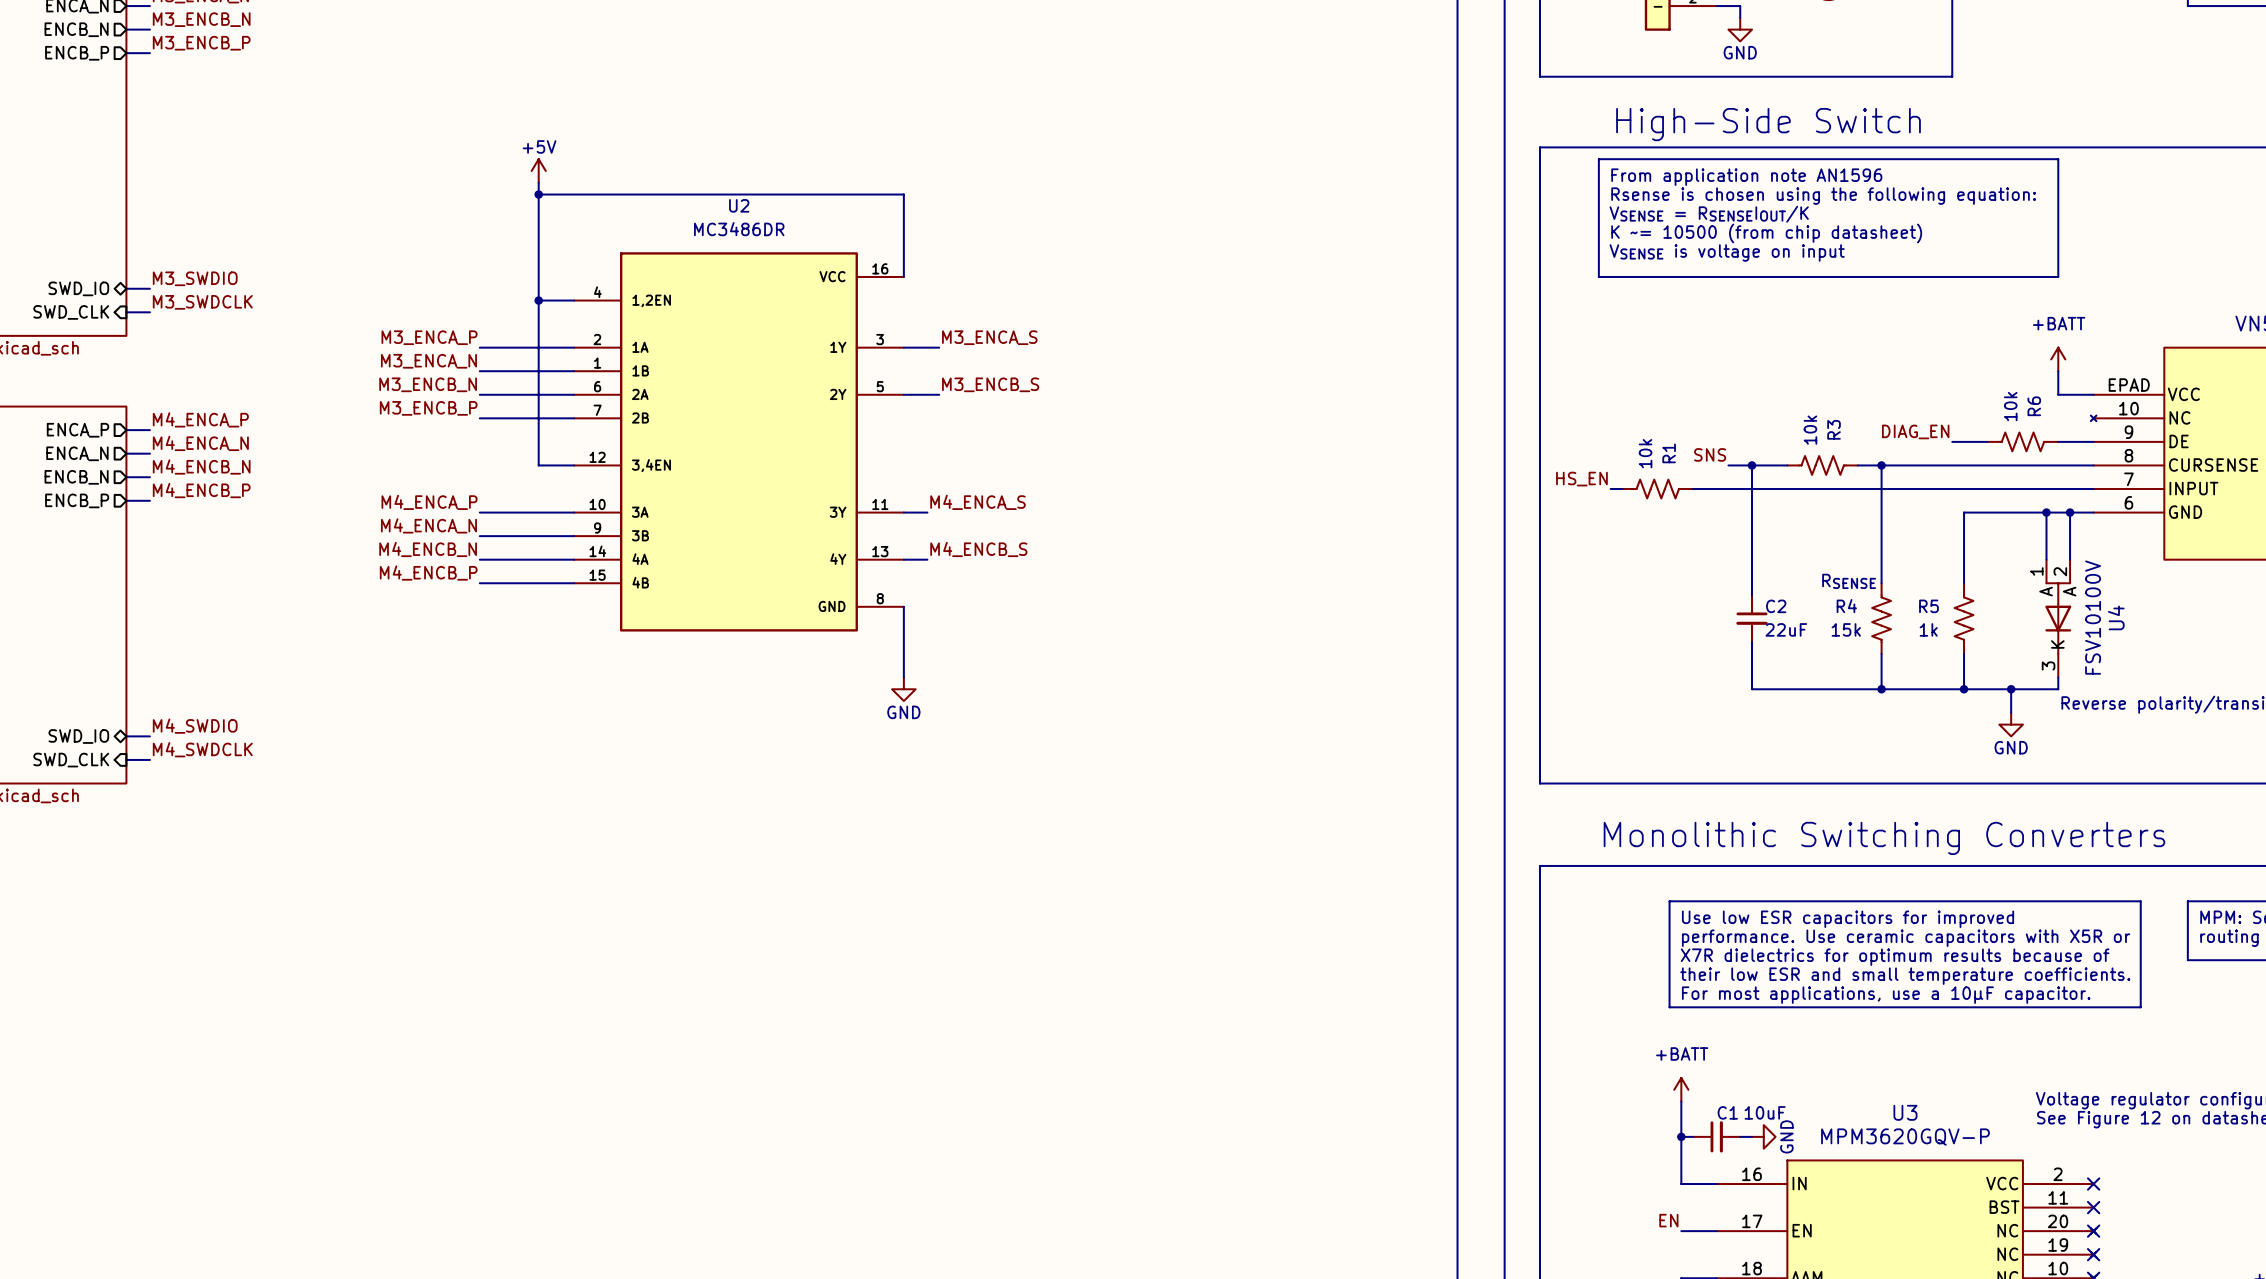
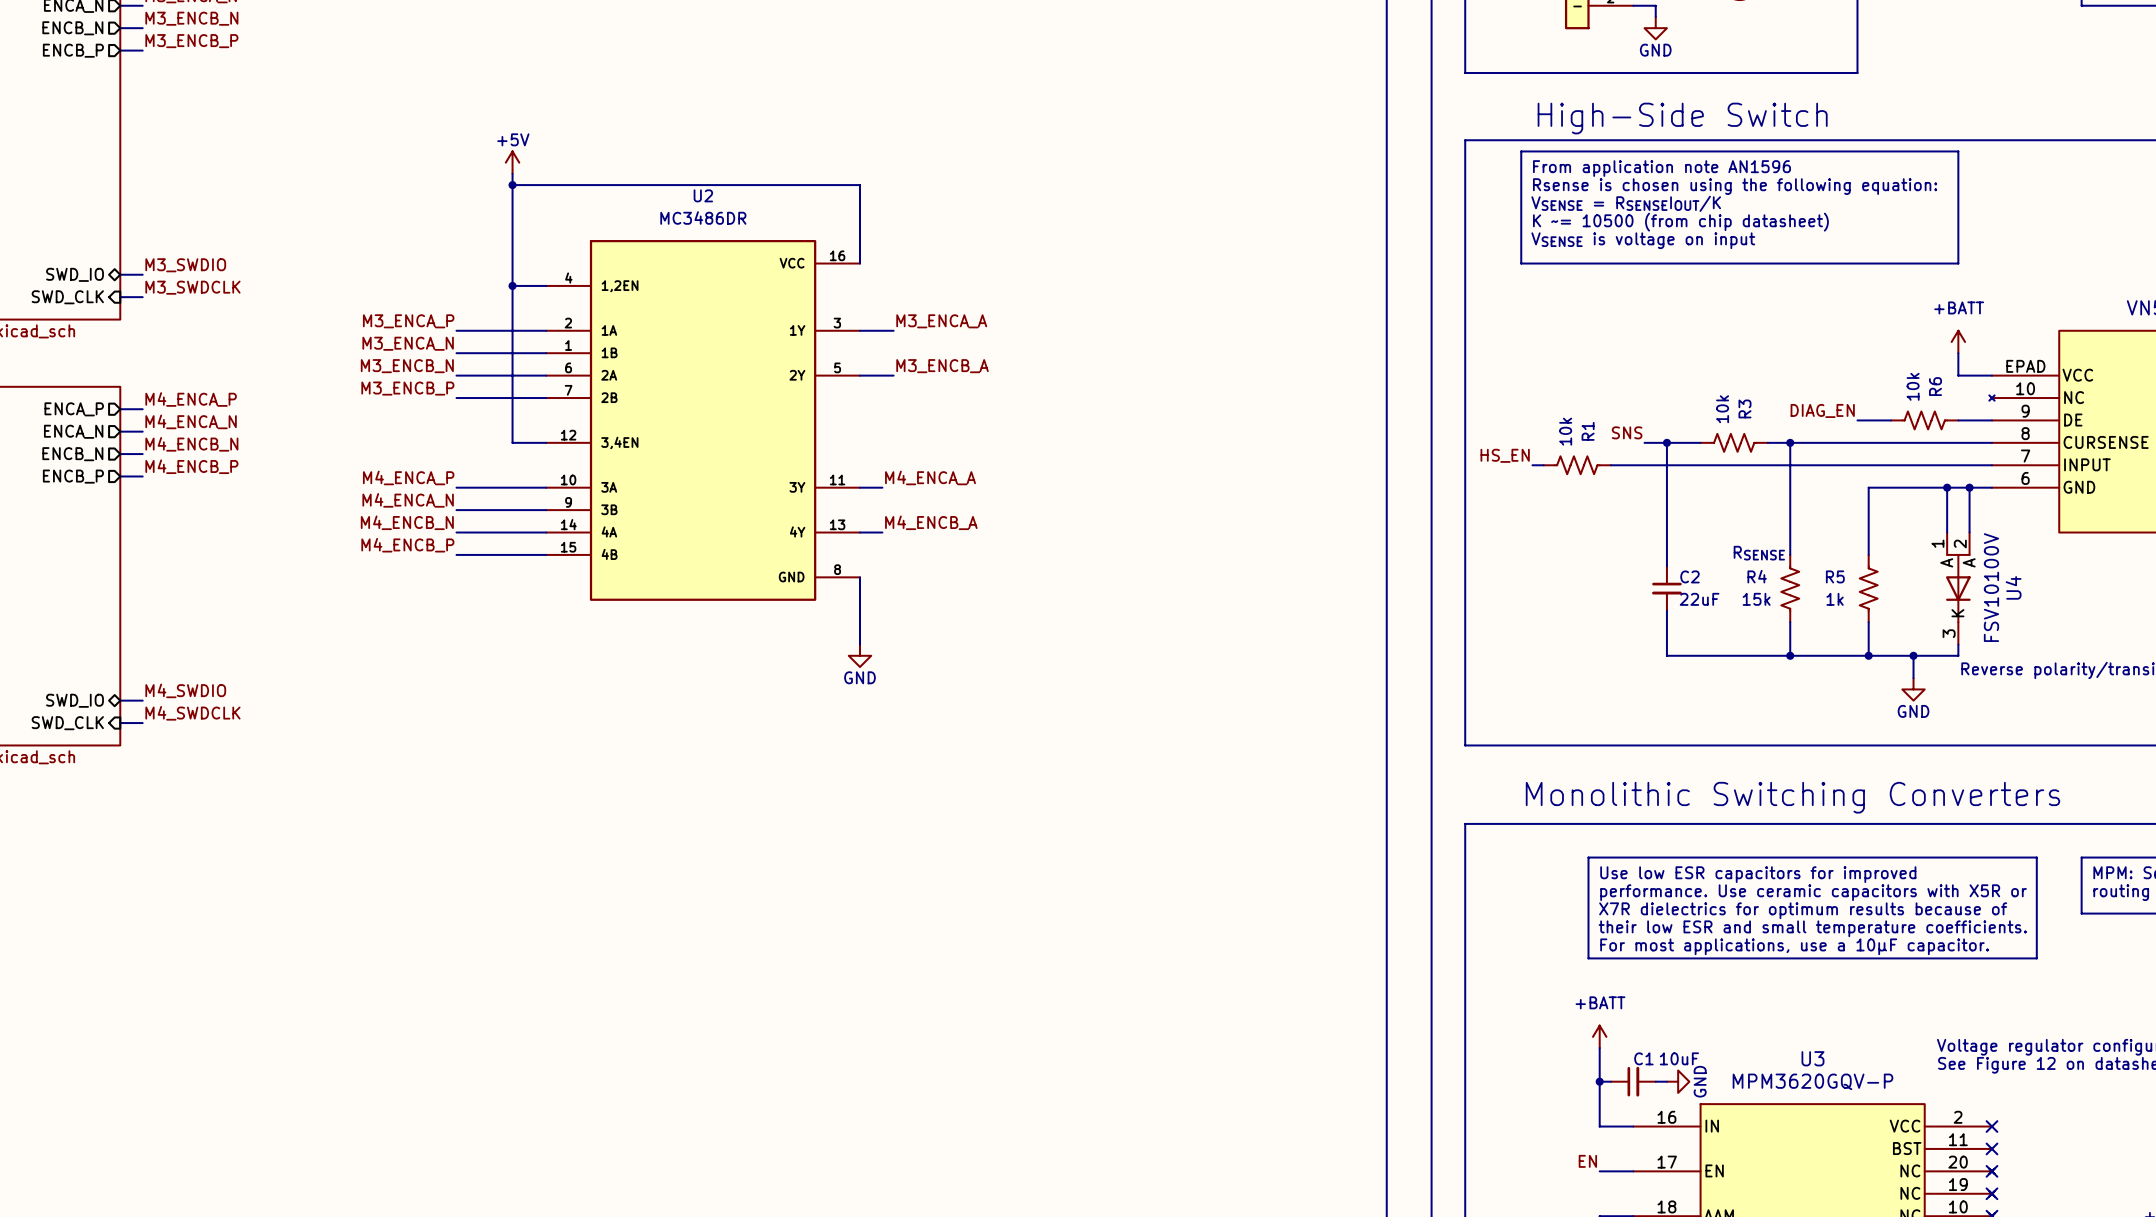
label: M3_ENCA_S (989, 337) -> M3_ENCA_A (941, 321)
label: M3_ENCB_S (990, 384) -> M3_ENCB_A (942, 366)
label: M4_ENCA_S (978, 502) -> M4_ENCA_A (930, 477)
label: M4_ENCB_S (978, 549) -> M4_ENCB_A (931, 522)

